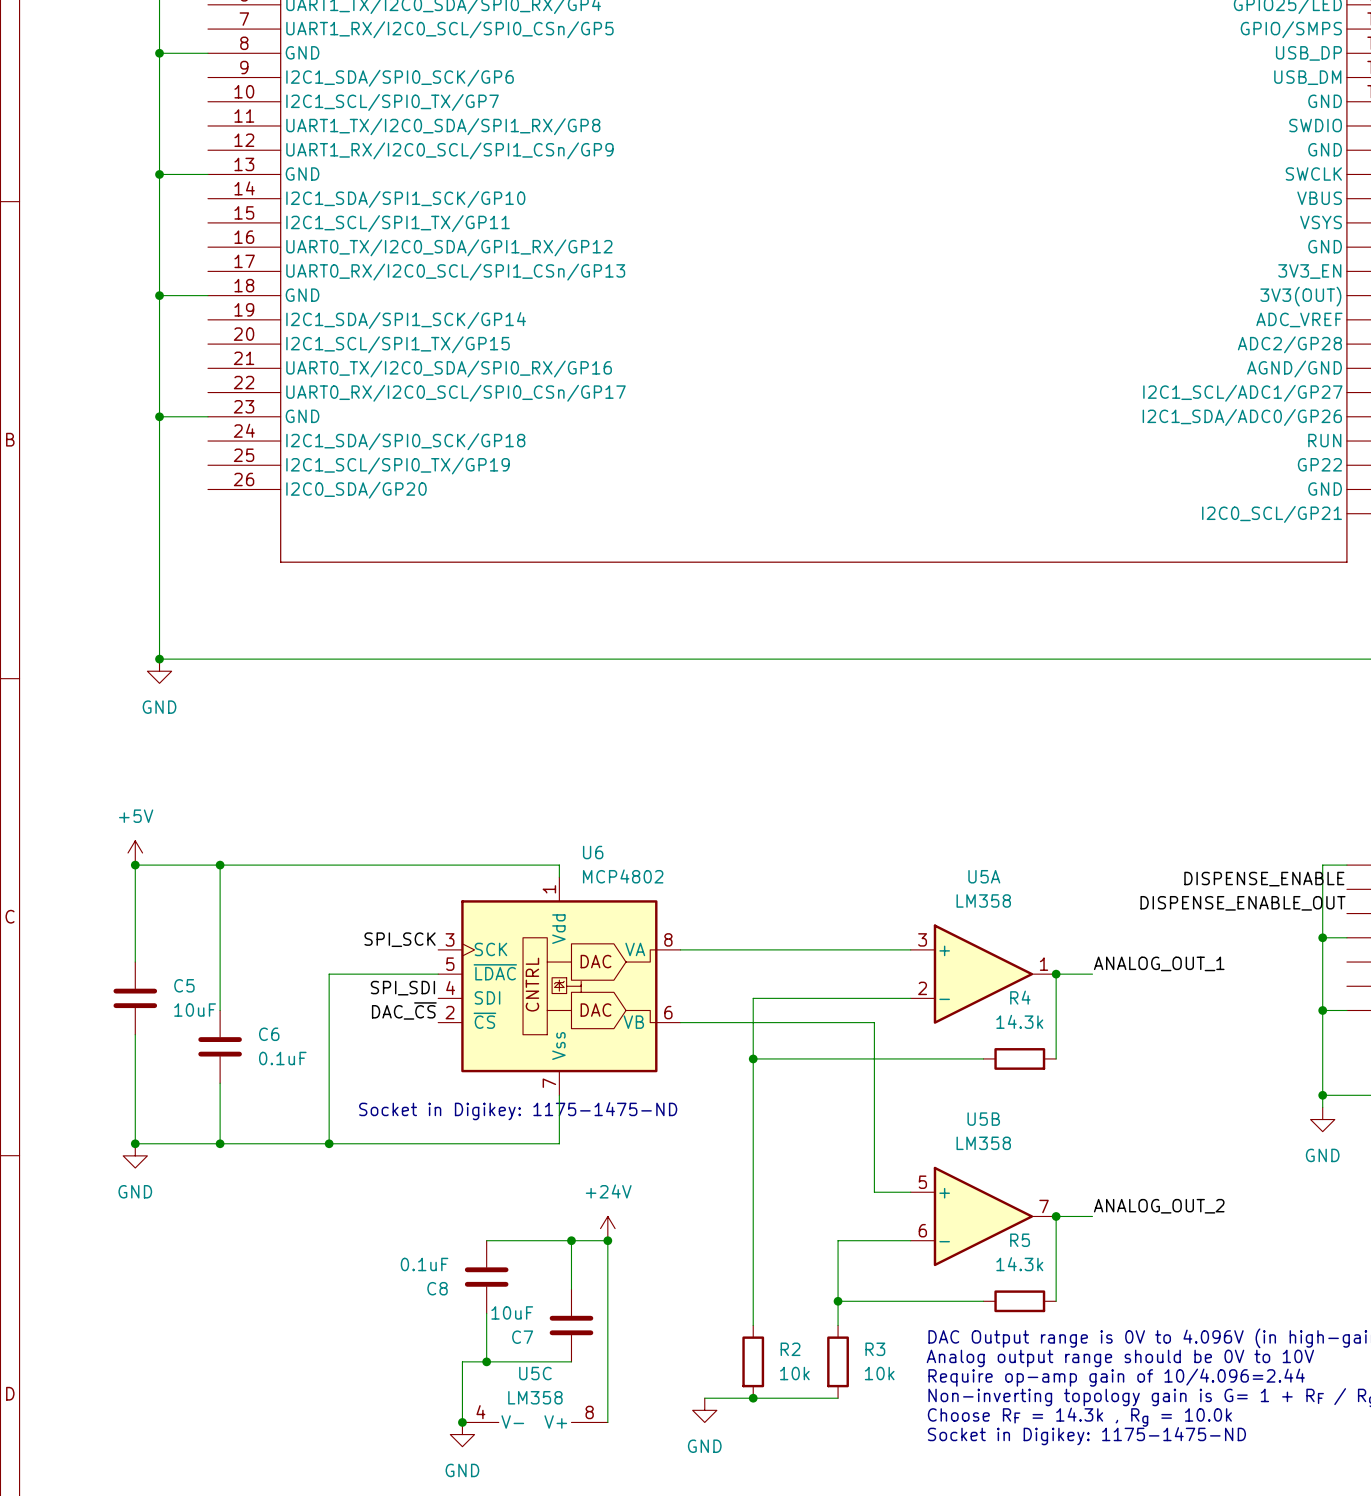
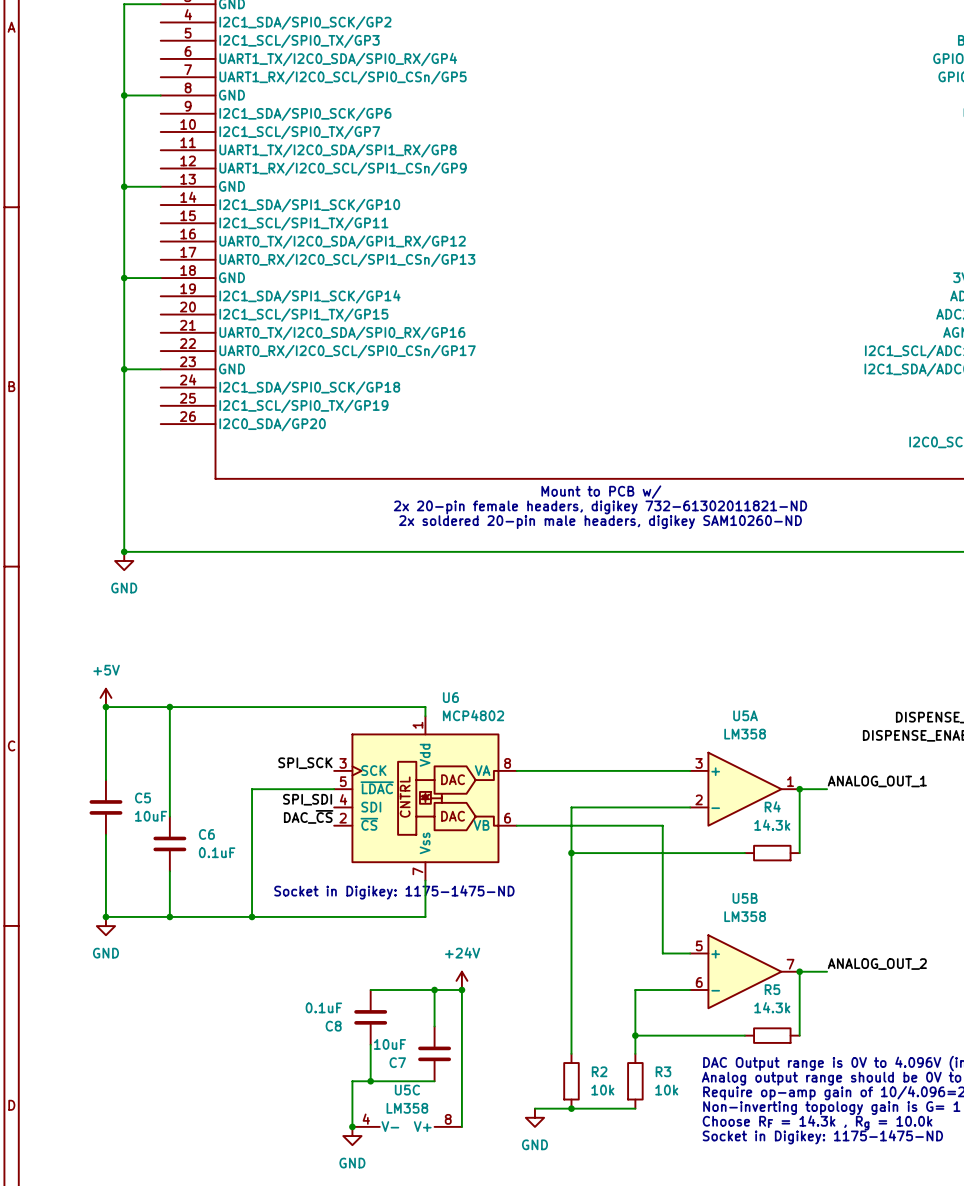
text: none -> Mount to PCB w/ (601, 492)
text: none -> 2x 20-pin female headers, digikey 732-61302011821-ND (600, 507)
text: none -> 2x soldered 20-pin male headers, digikey SAM10260-ND (600, 522)

